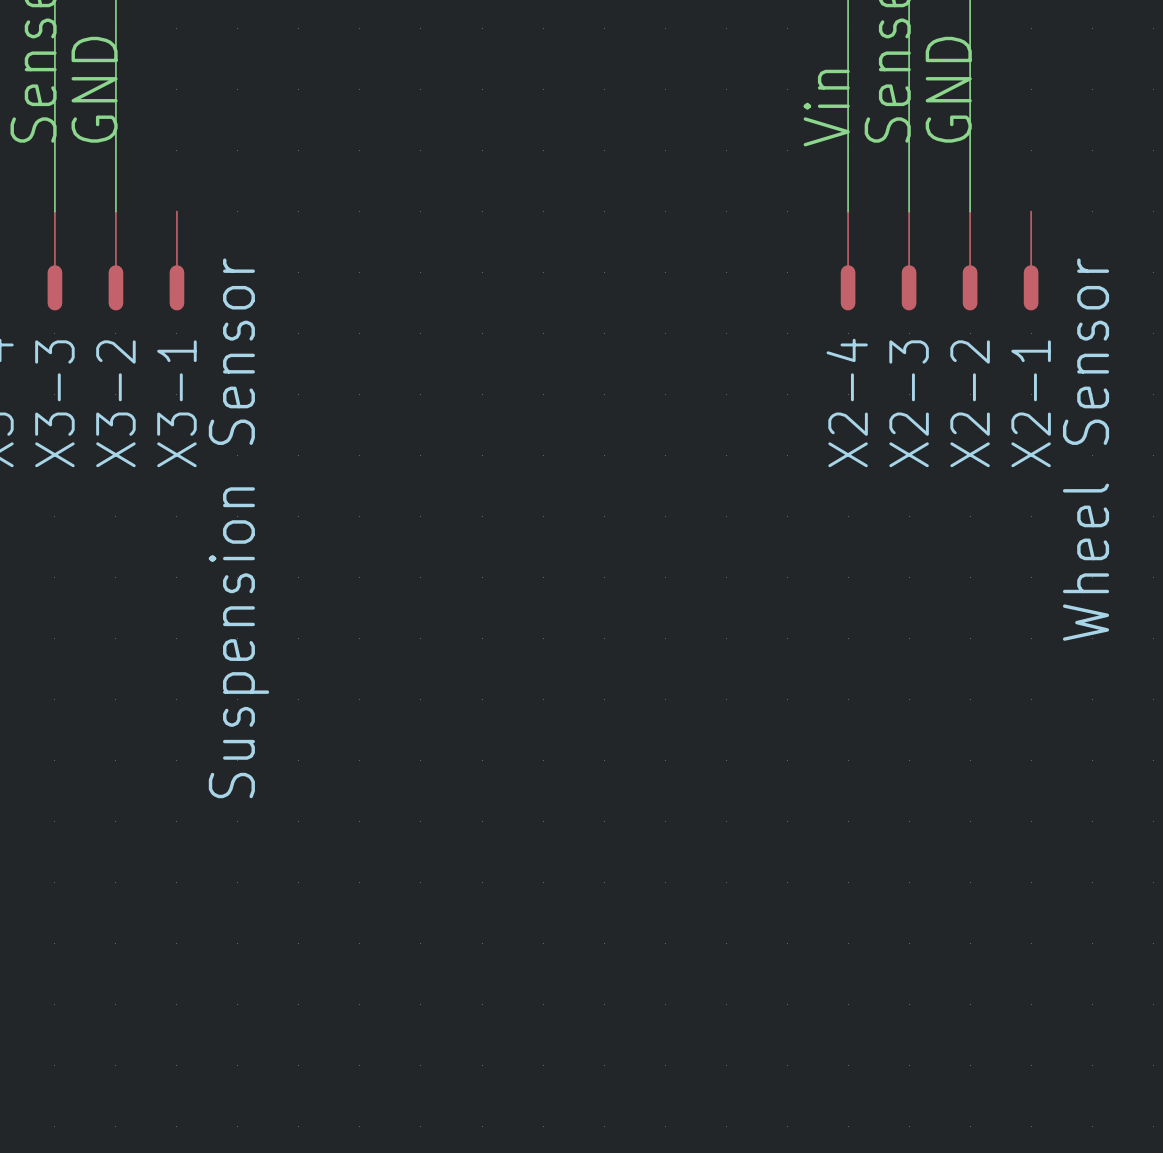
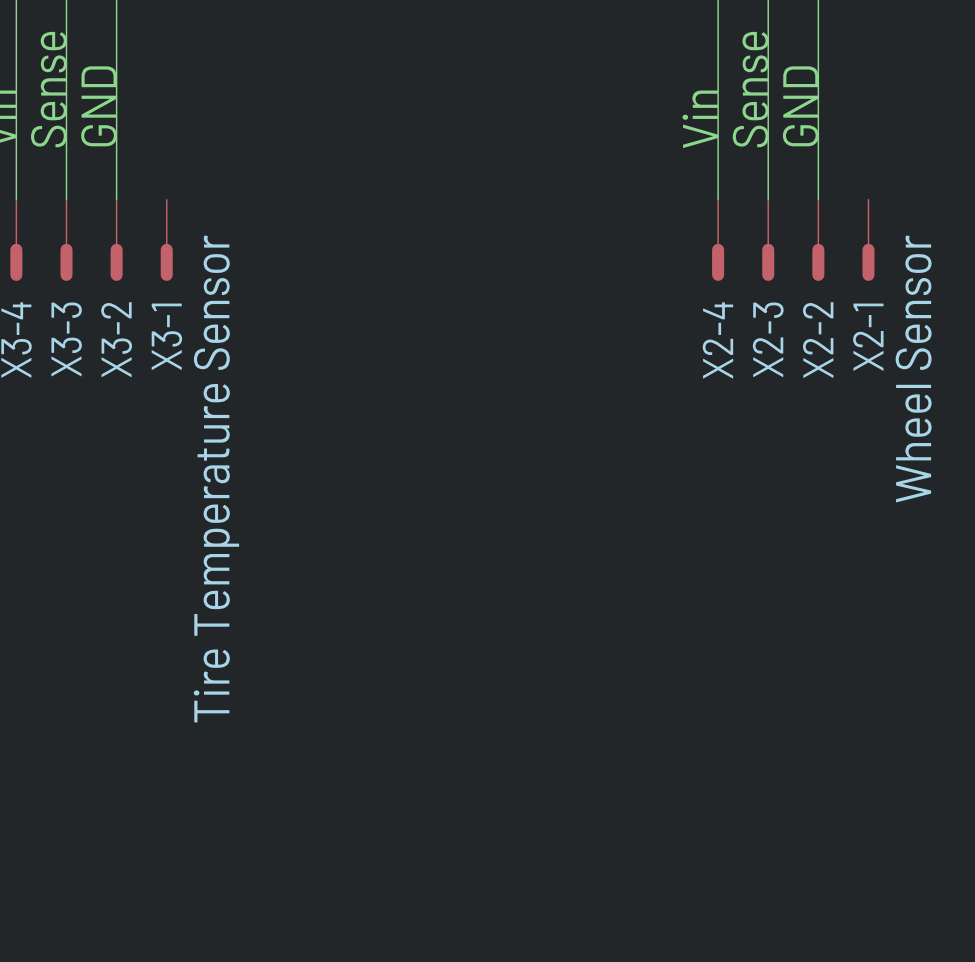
X3-1 value: Suspension Sensor (238, 528) -> Tire Temperature Sensor (216, 478)

